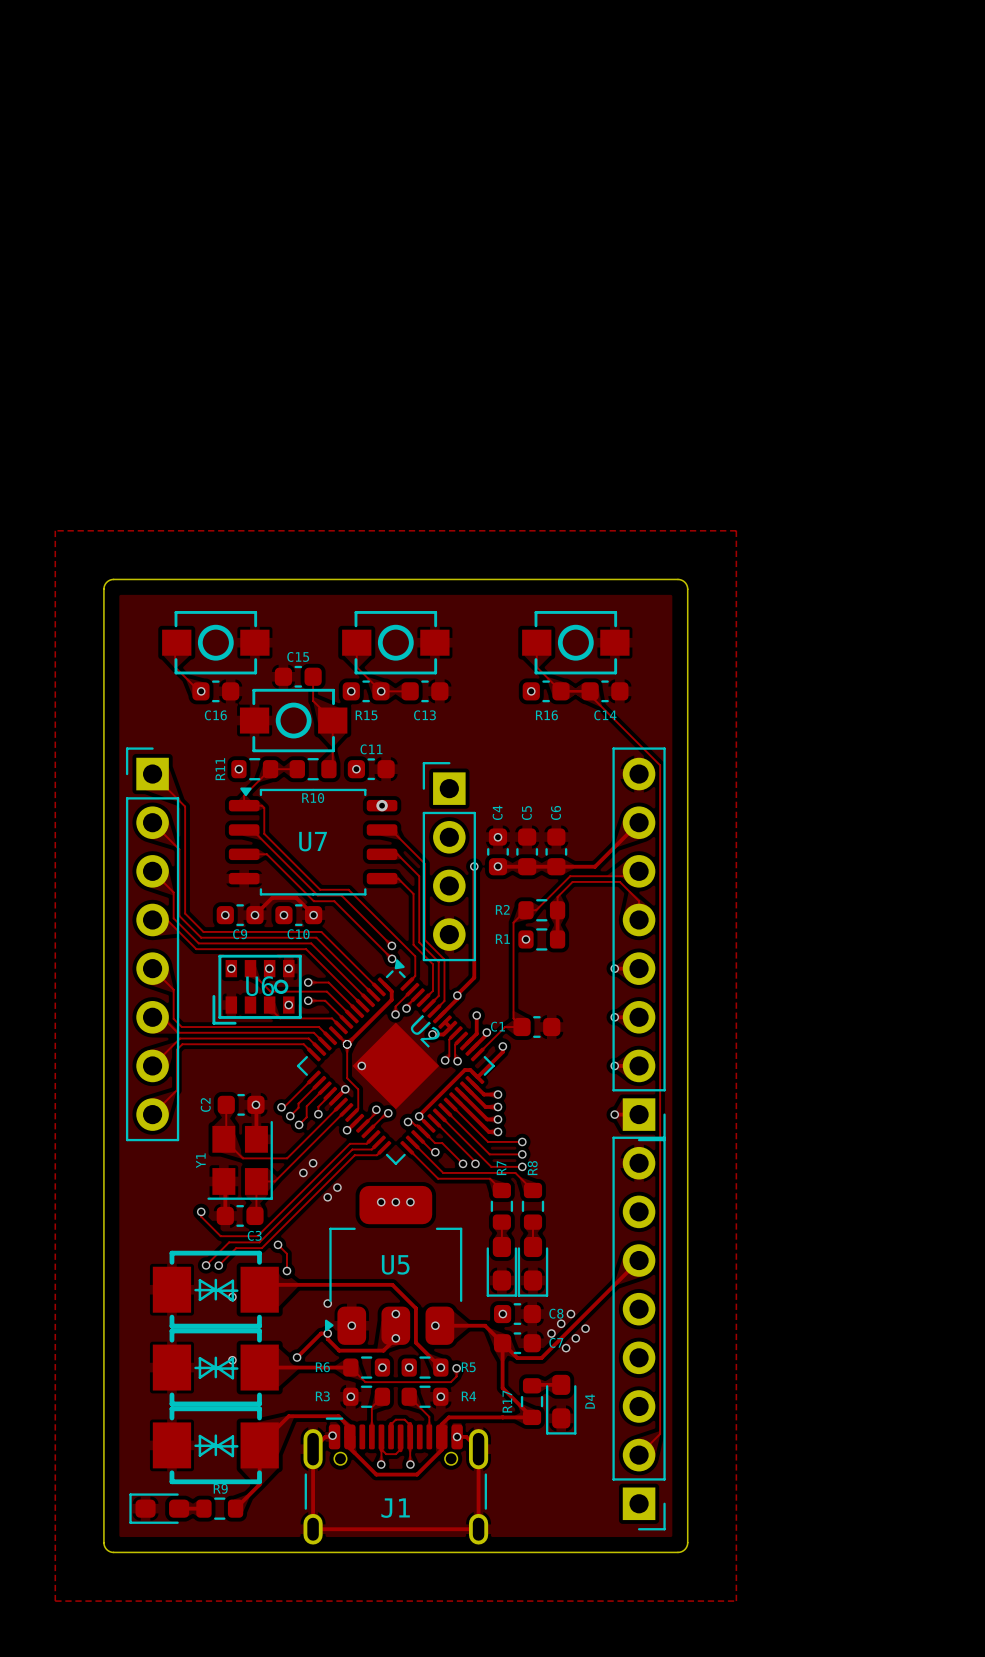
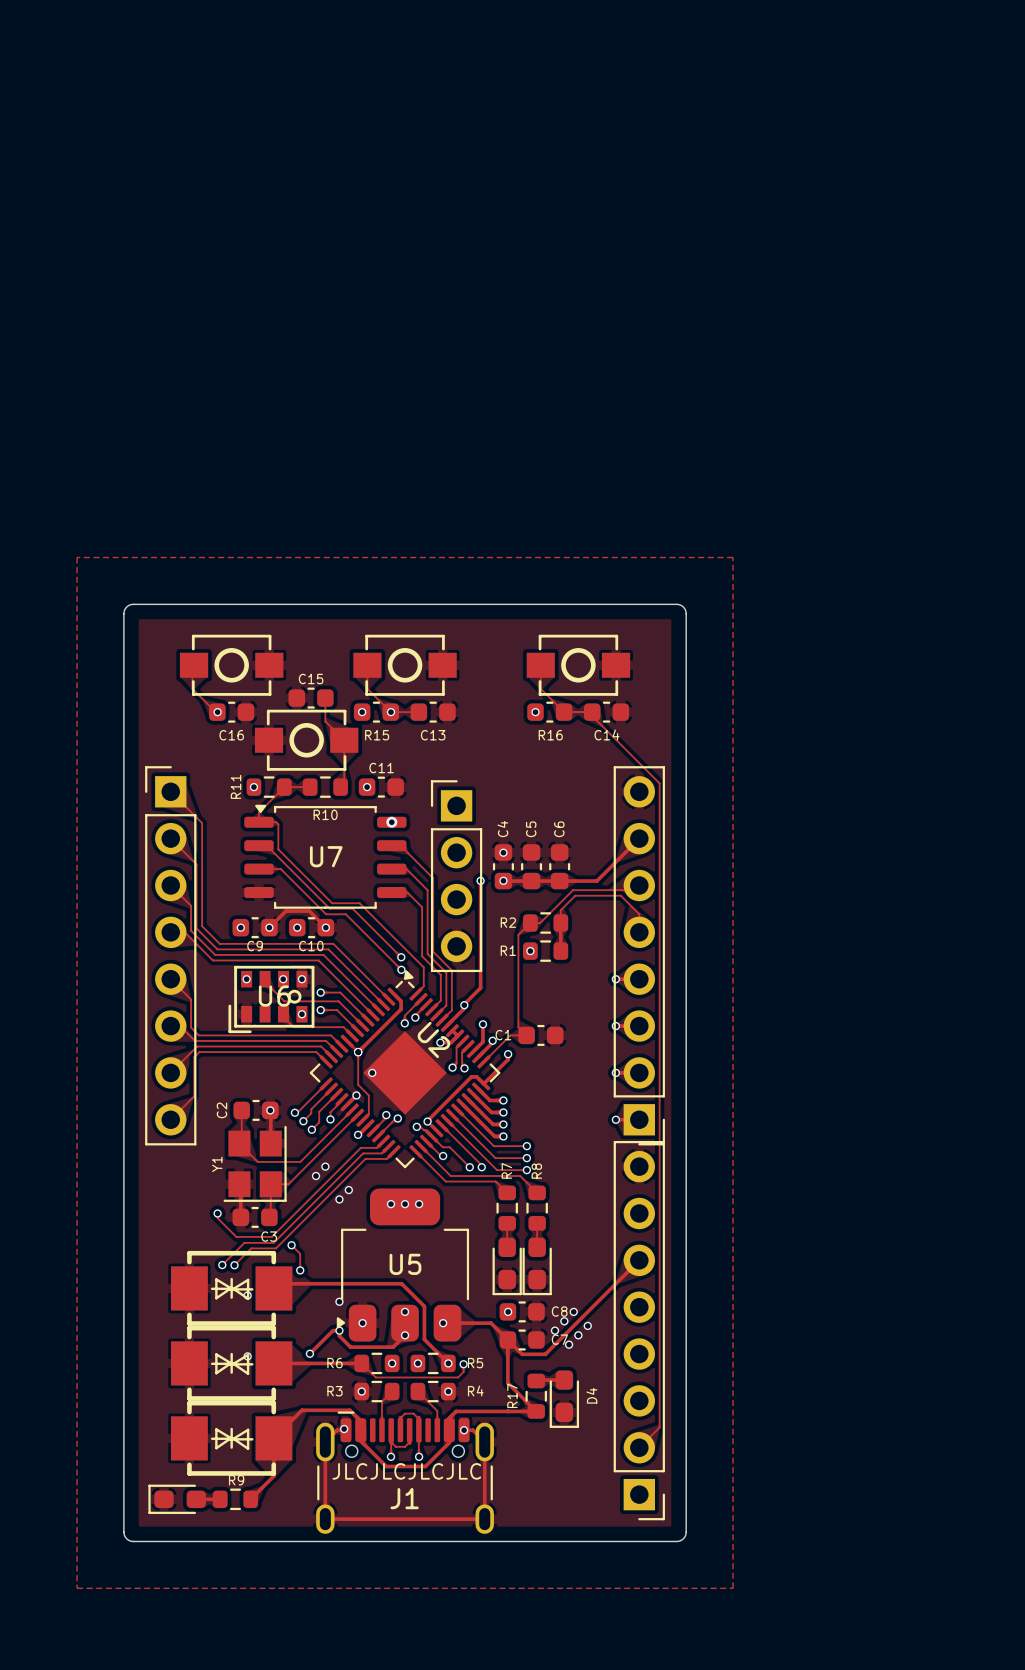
text: none -> JLCJLCJLCJLC (406, 1471)

